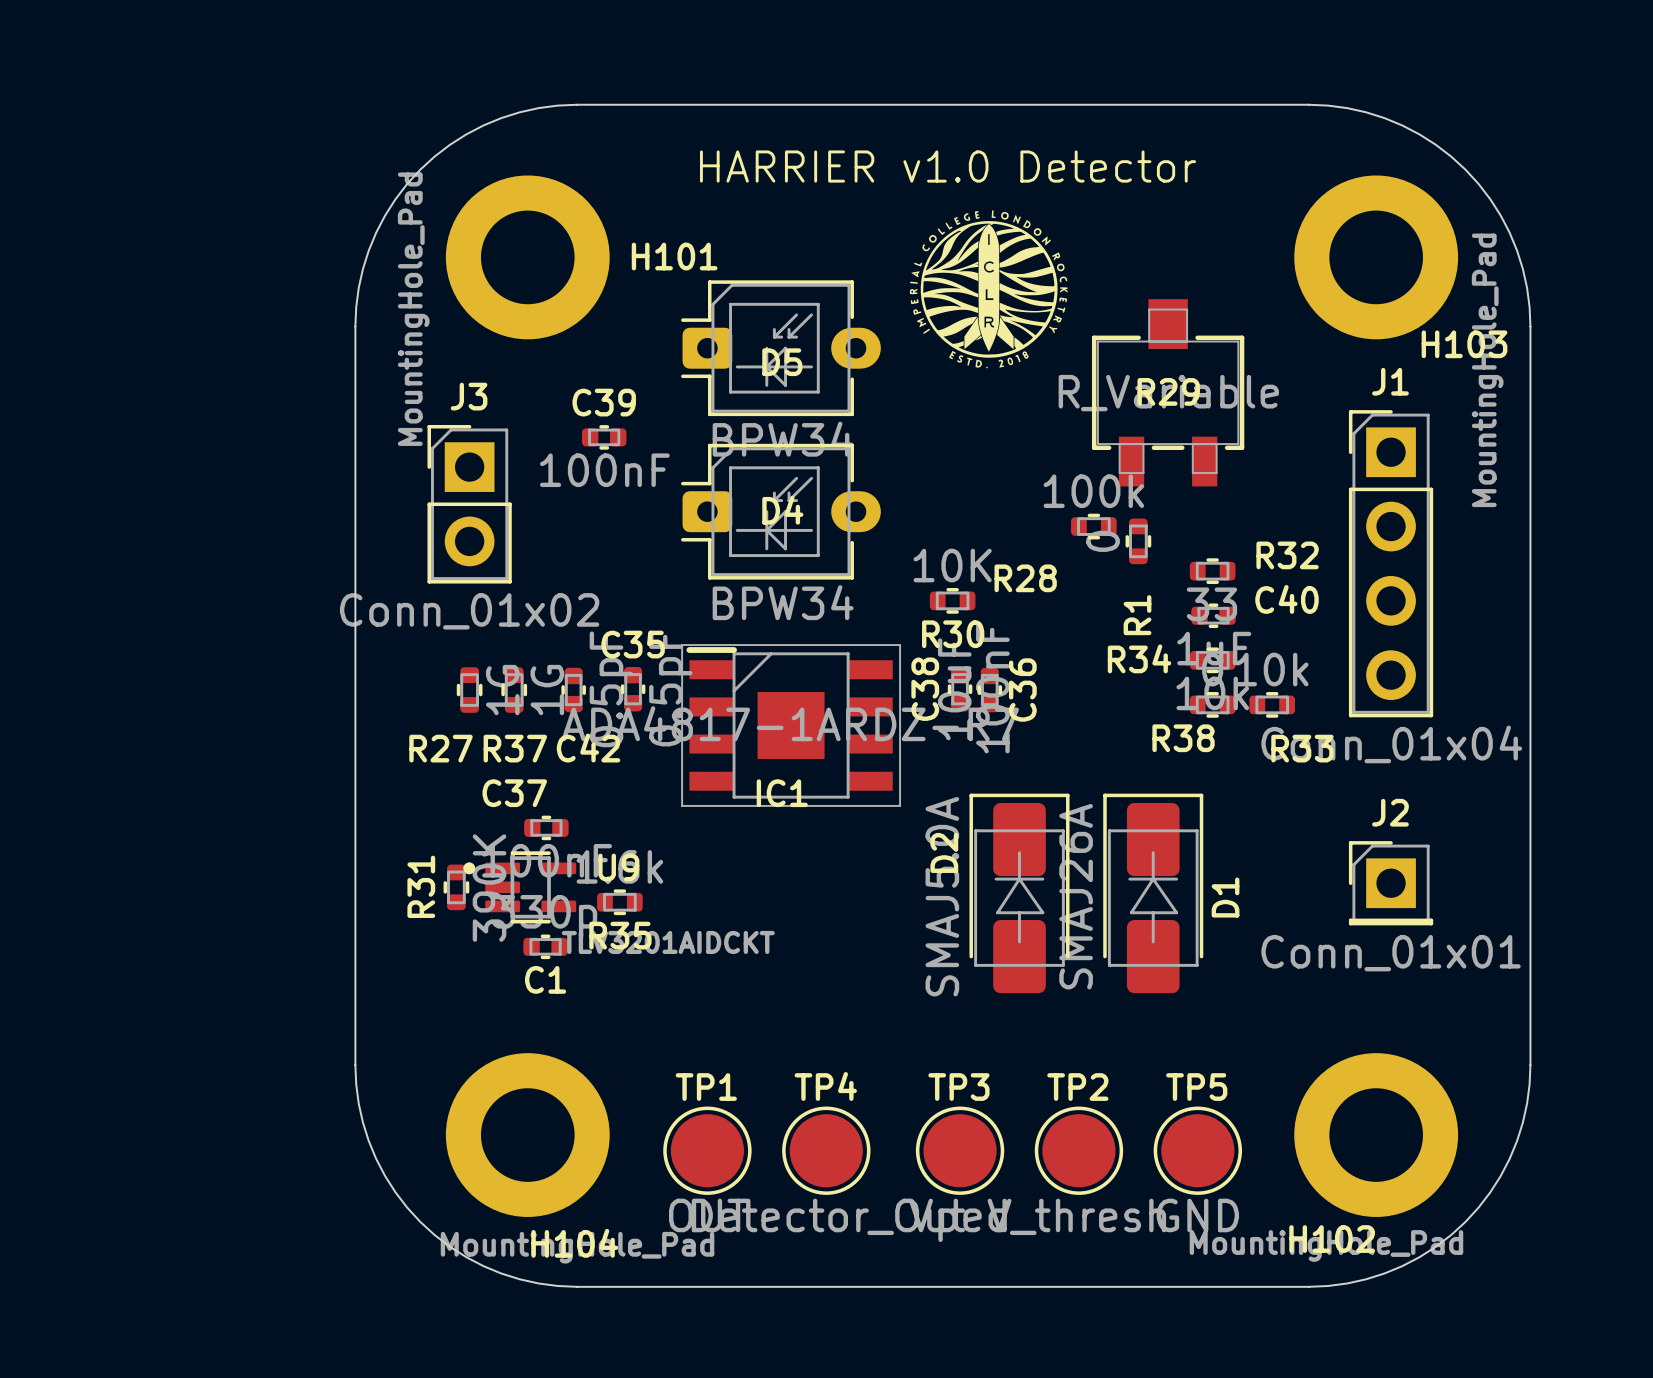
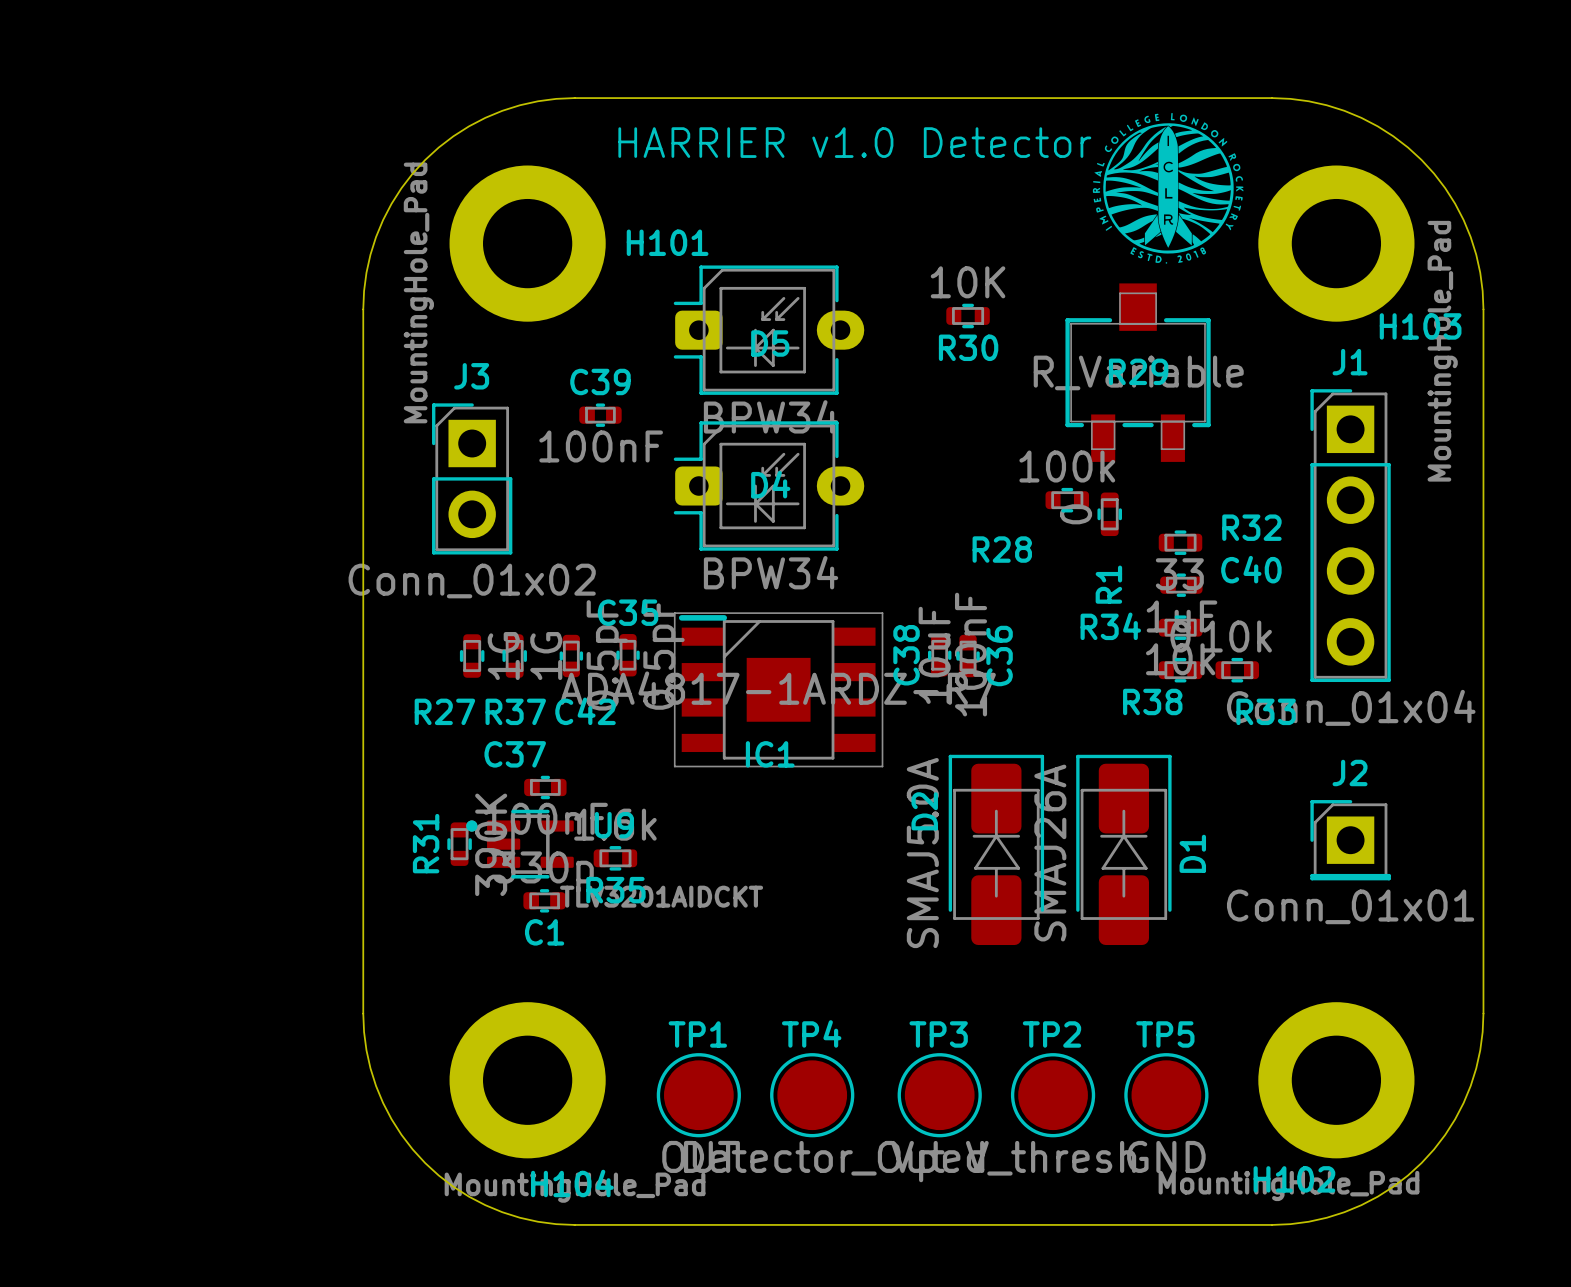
text position: HARRIER v1.0 Detector (948, 166) -> HARRIER v1.0 Detector (854, 142)
drawing position: (988, 289) -> (1168, 188)
R30 position: (952, 600) -> (968, 315)

